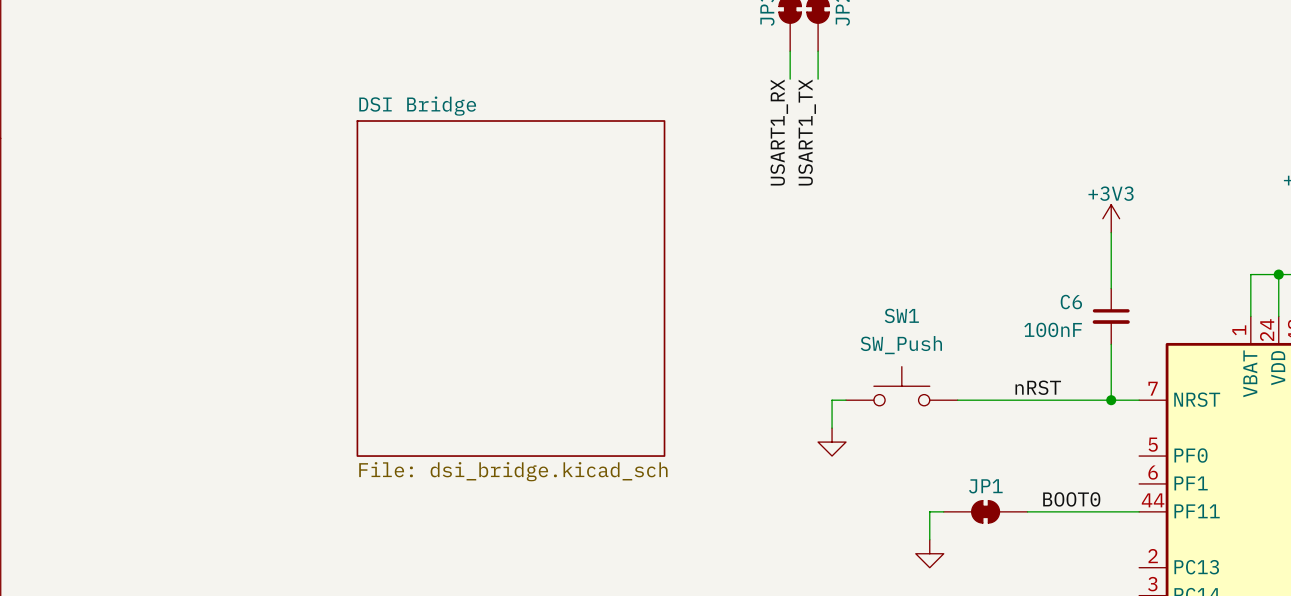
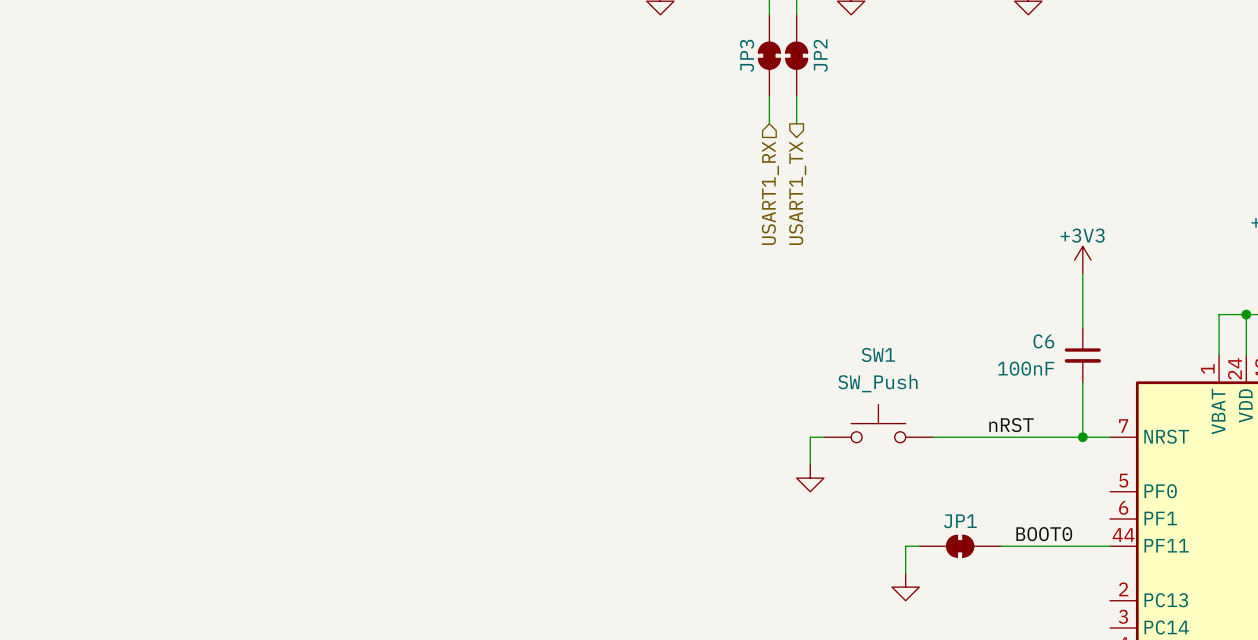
label: USART1_RX (779, 132) -> none
label: USART1_TX (807, 132) -> none
hierarchical label: none -> USART1_RX (770, 193)
hierarchical label: none -> USART1_TX (797, 193)
sheet DSI Bridge: File: dsi_bridge.kicad_sch (510, 288) -> none

